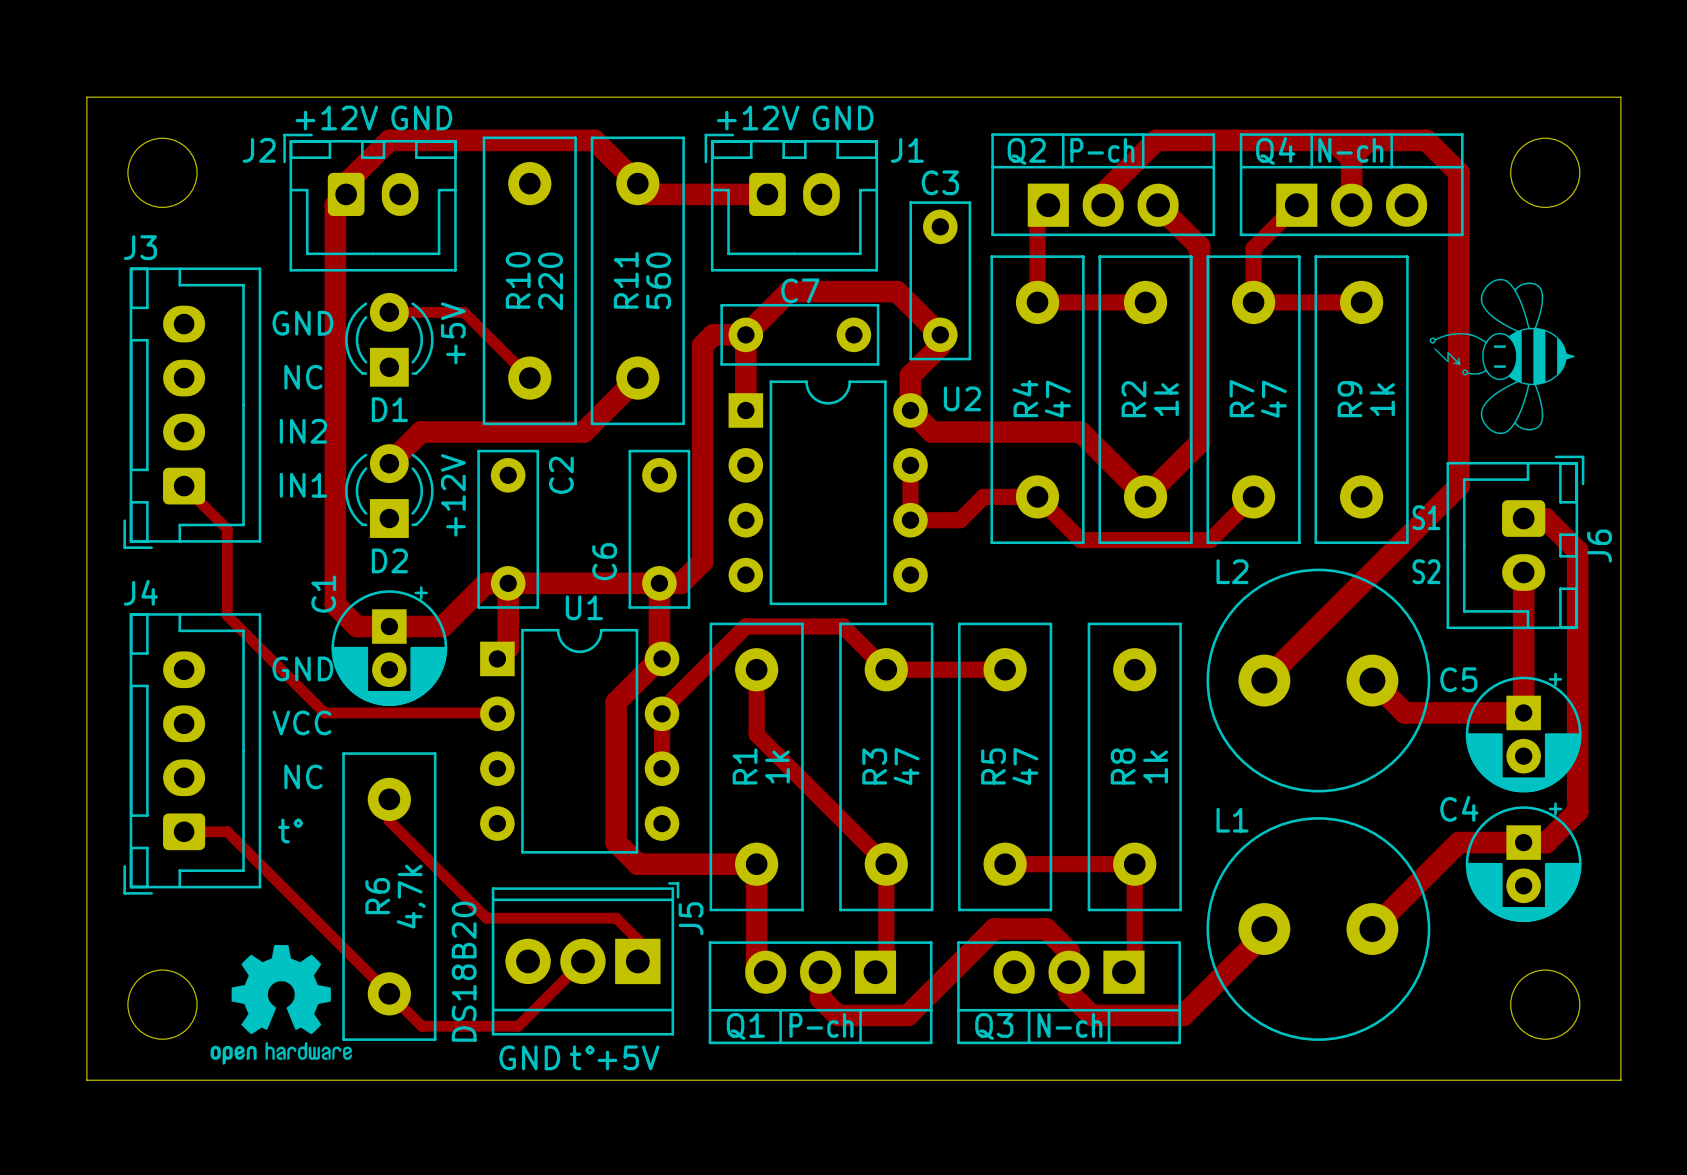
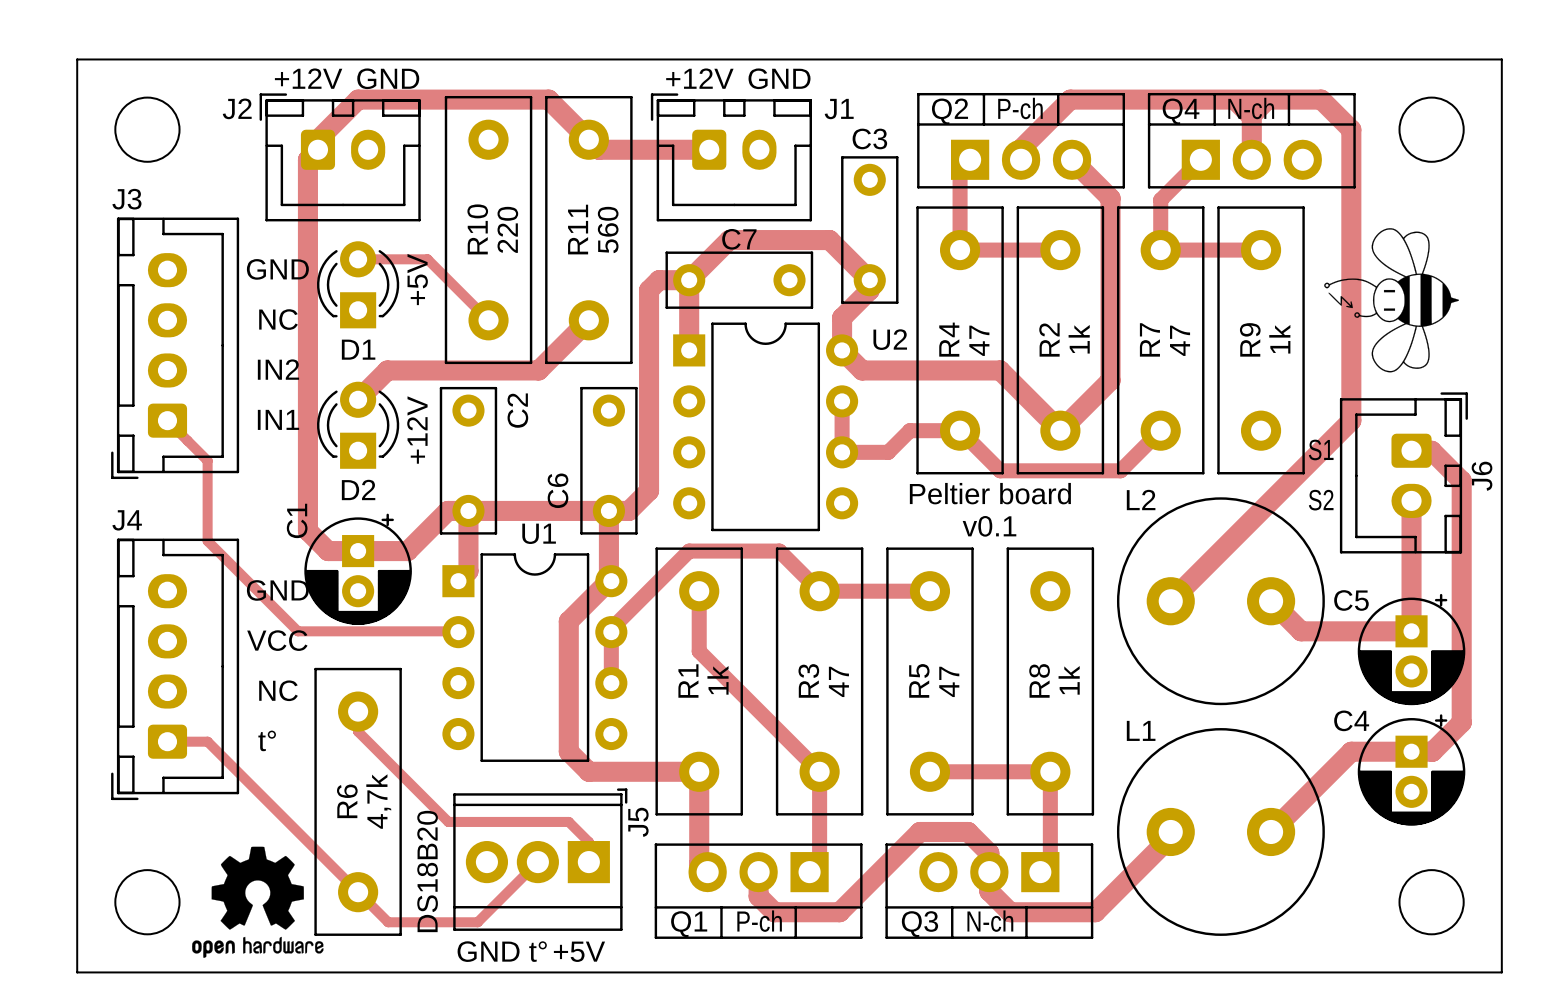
text: none -> Peltier board (990, 493)
text: none -> v0.1 (989, 526)

